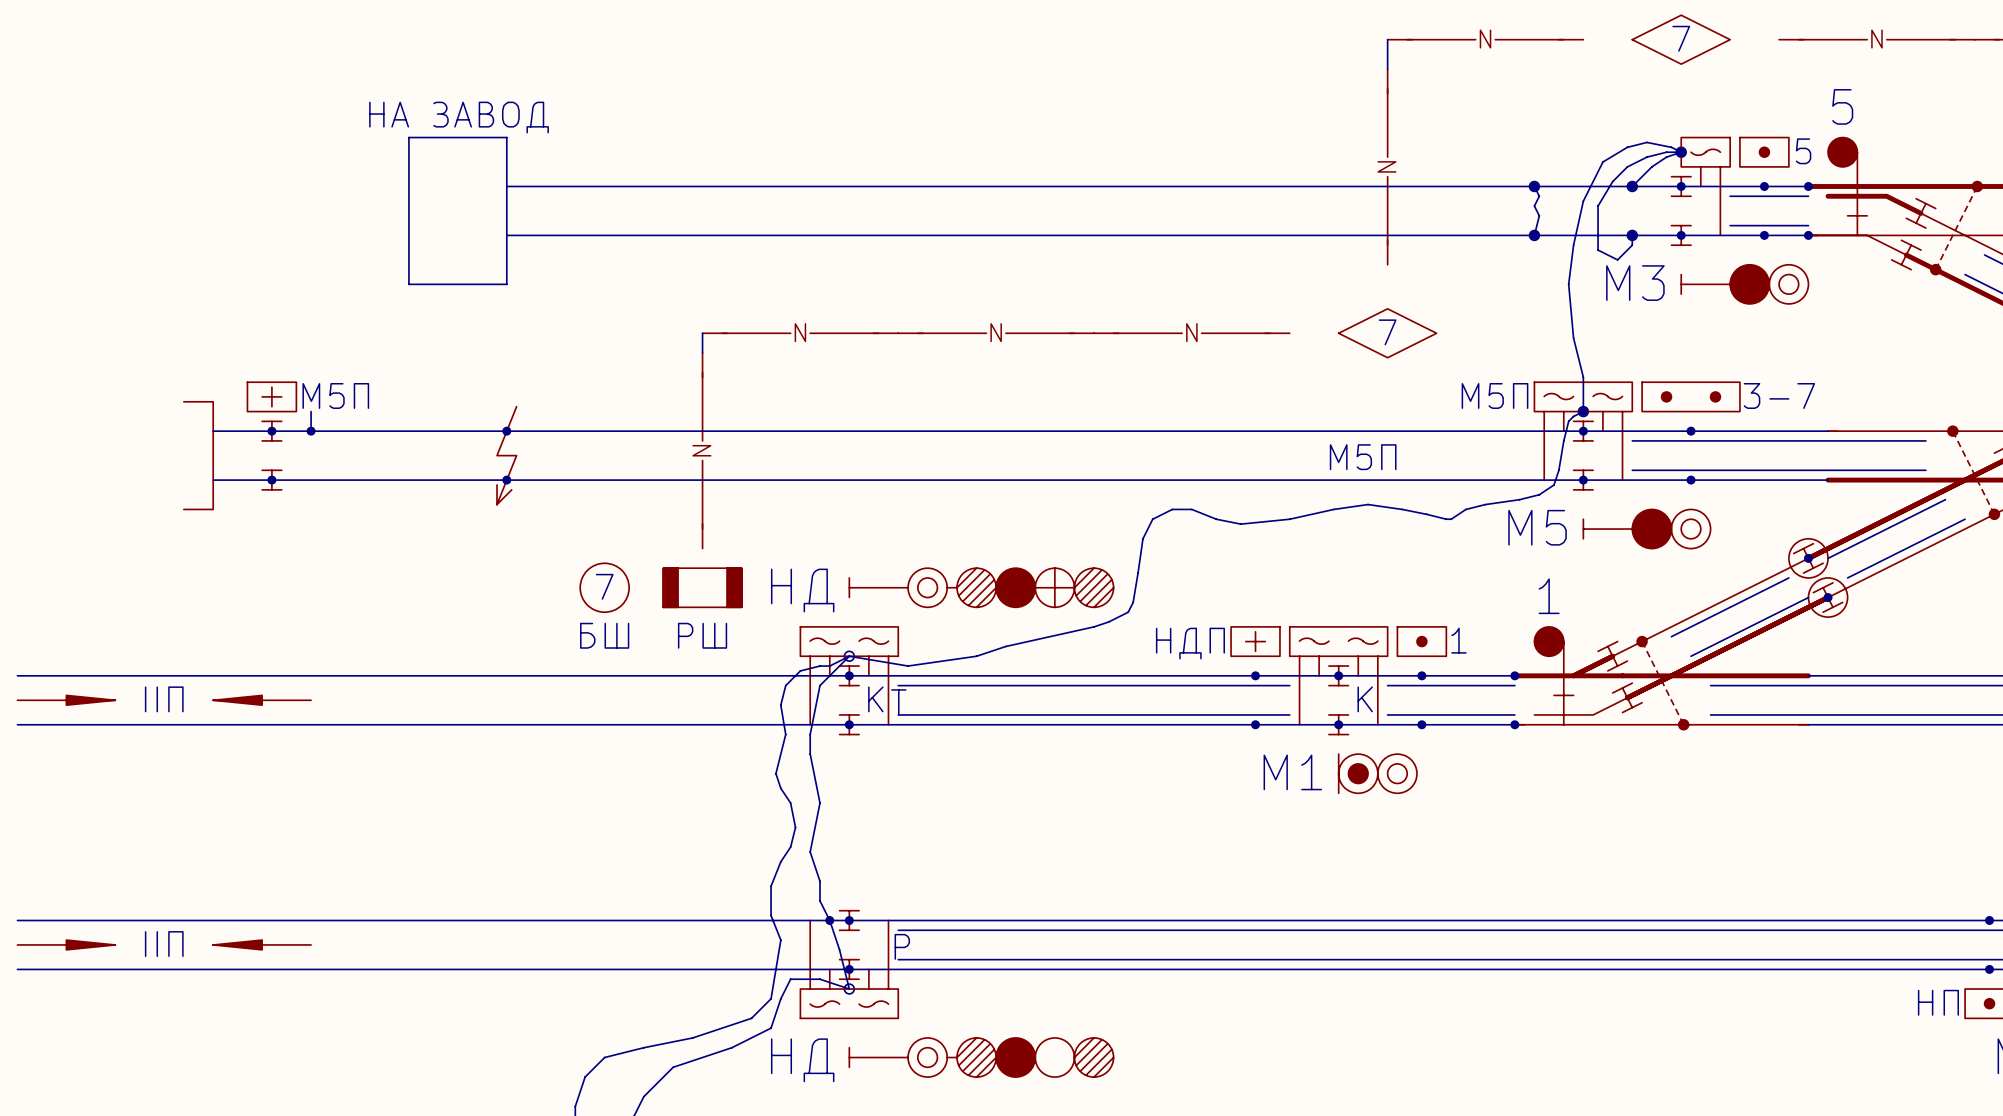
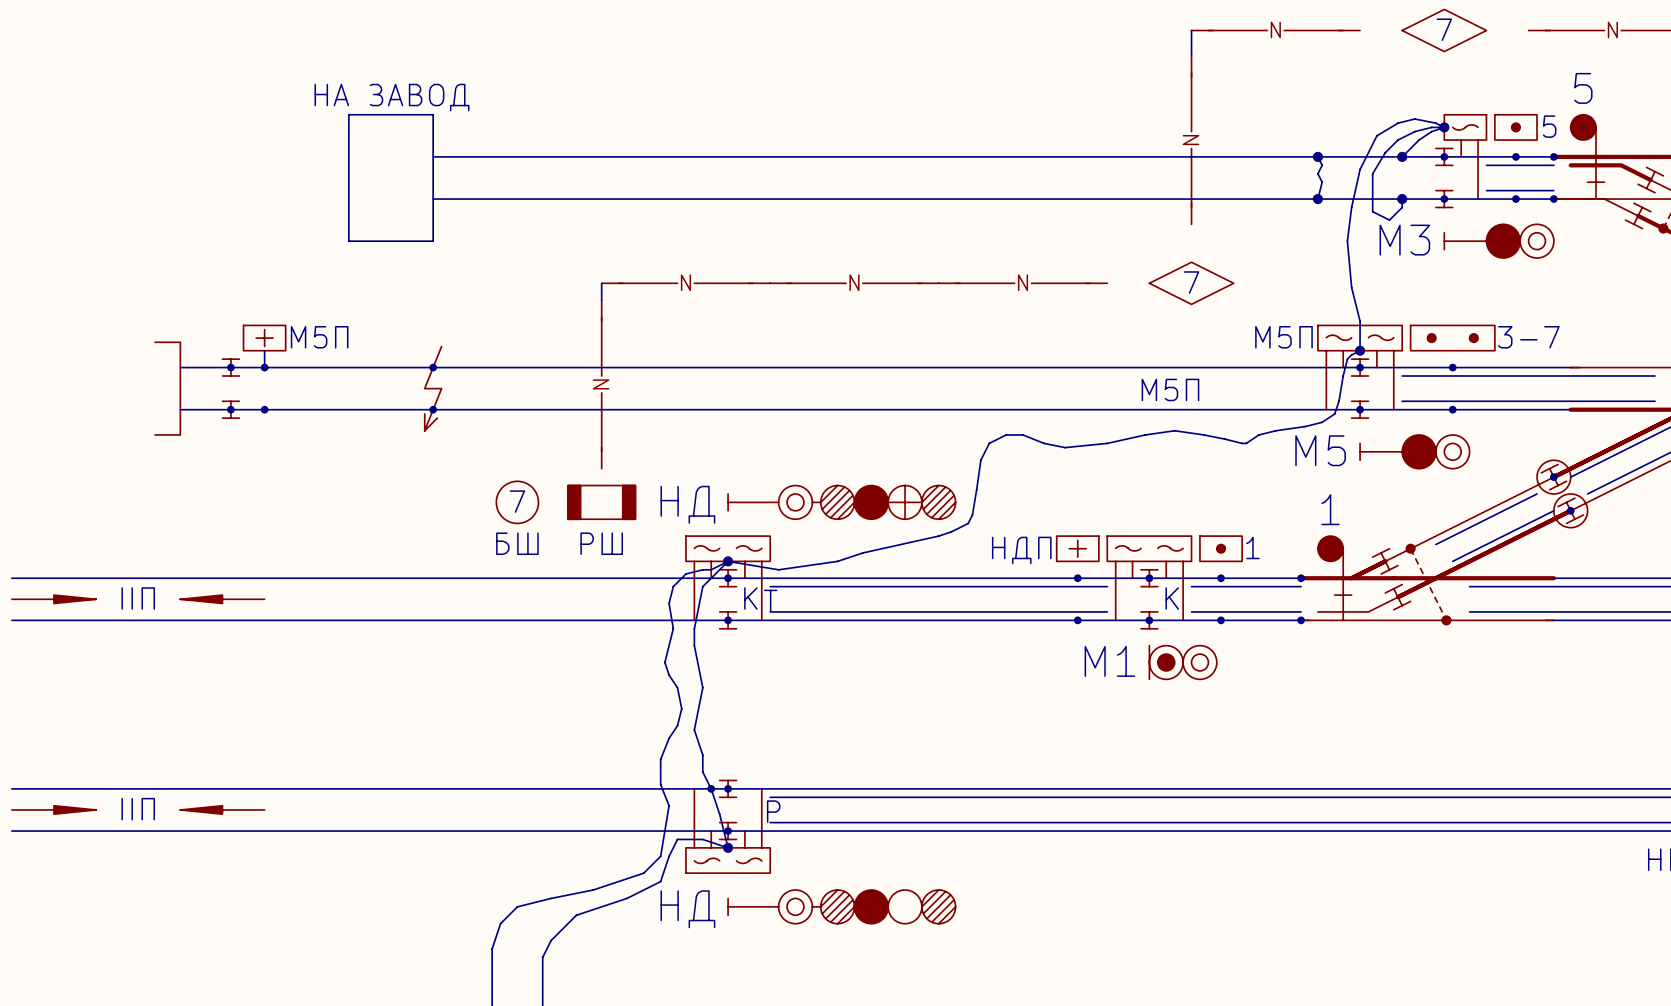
power symbol position: (271, 396) -> (264, 338)
junction: none -> (264, 409)
junction: none -> (728, 561)
junction: none -> (728, 847)

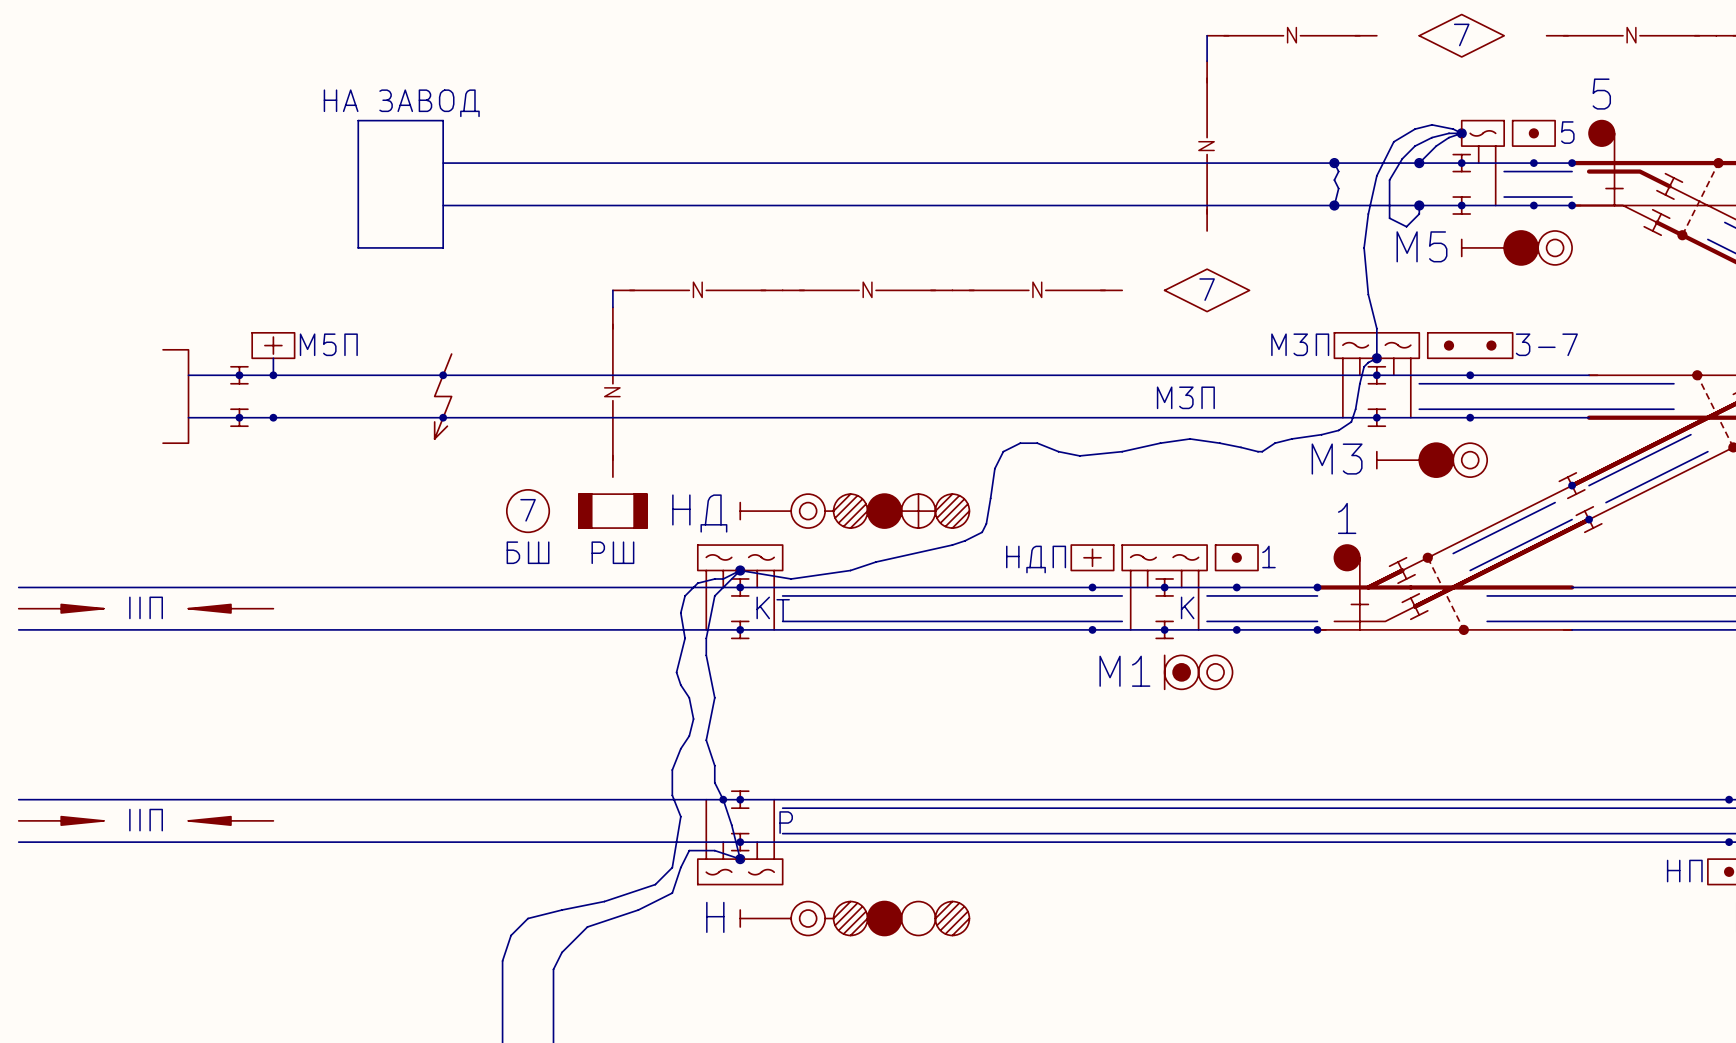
part text: М3 (1404, 240) -> М5 (1421, 246)
part text: М5П (1283, 337) -> М3П (1300, 344)
text: М5П (1170, 389) -> М3П (1185, 397)
part text: М5 (1320, 450) -> М3 (1337, 459)
part symbol: [1537, 460, 1588, 528] -> [1559, 472, 1602, 533]
part text: НД (687, 909) -> Н (715, 917)

